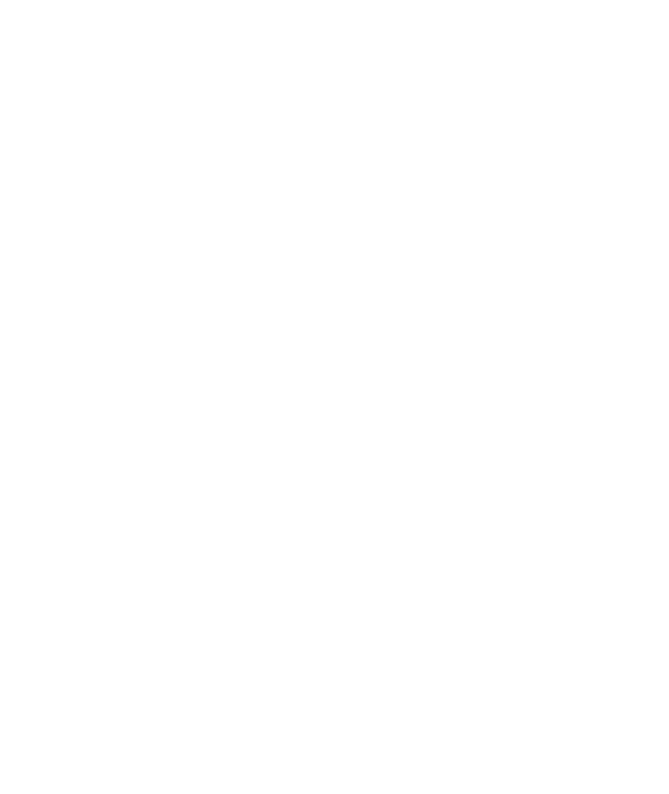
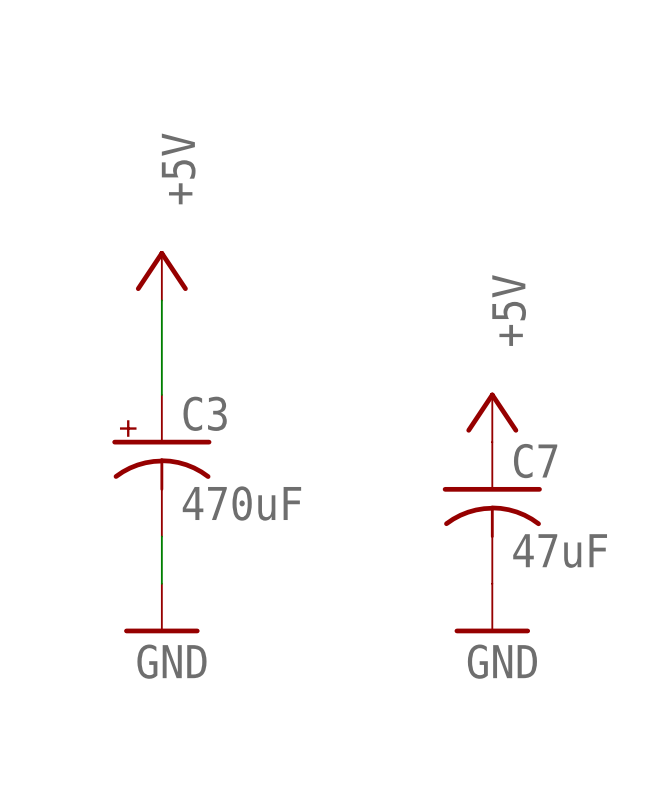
power symbol: none -> +5V (161, 275)
wire: none -> (161, 300) (161, 394)
power symbol: none -> +5V (492, 417)
C3: none -> 470uF (161, 465)
C7: none -> 47uF (492, 512)
wire: none -> (161, 536) (161, 583)
power symbol: none -> GND (161, 608)
power symbol: none -> GND (492, 608)

